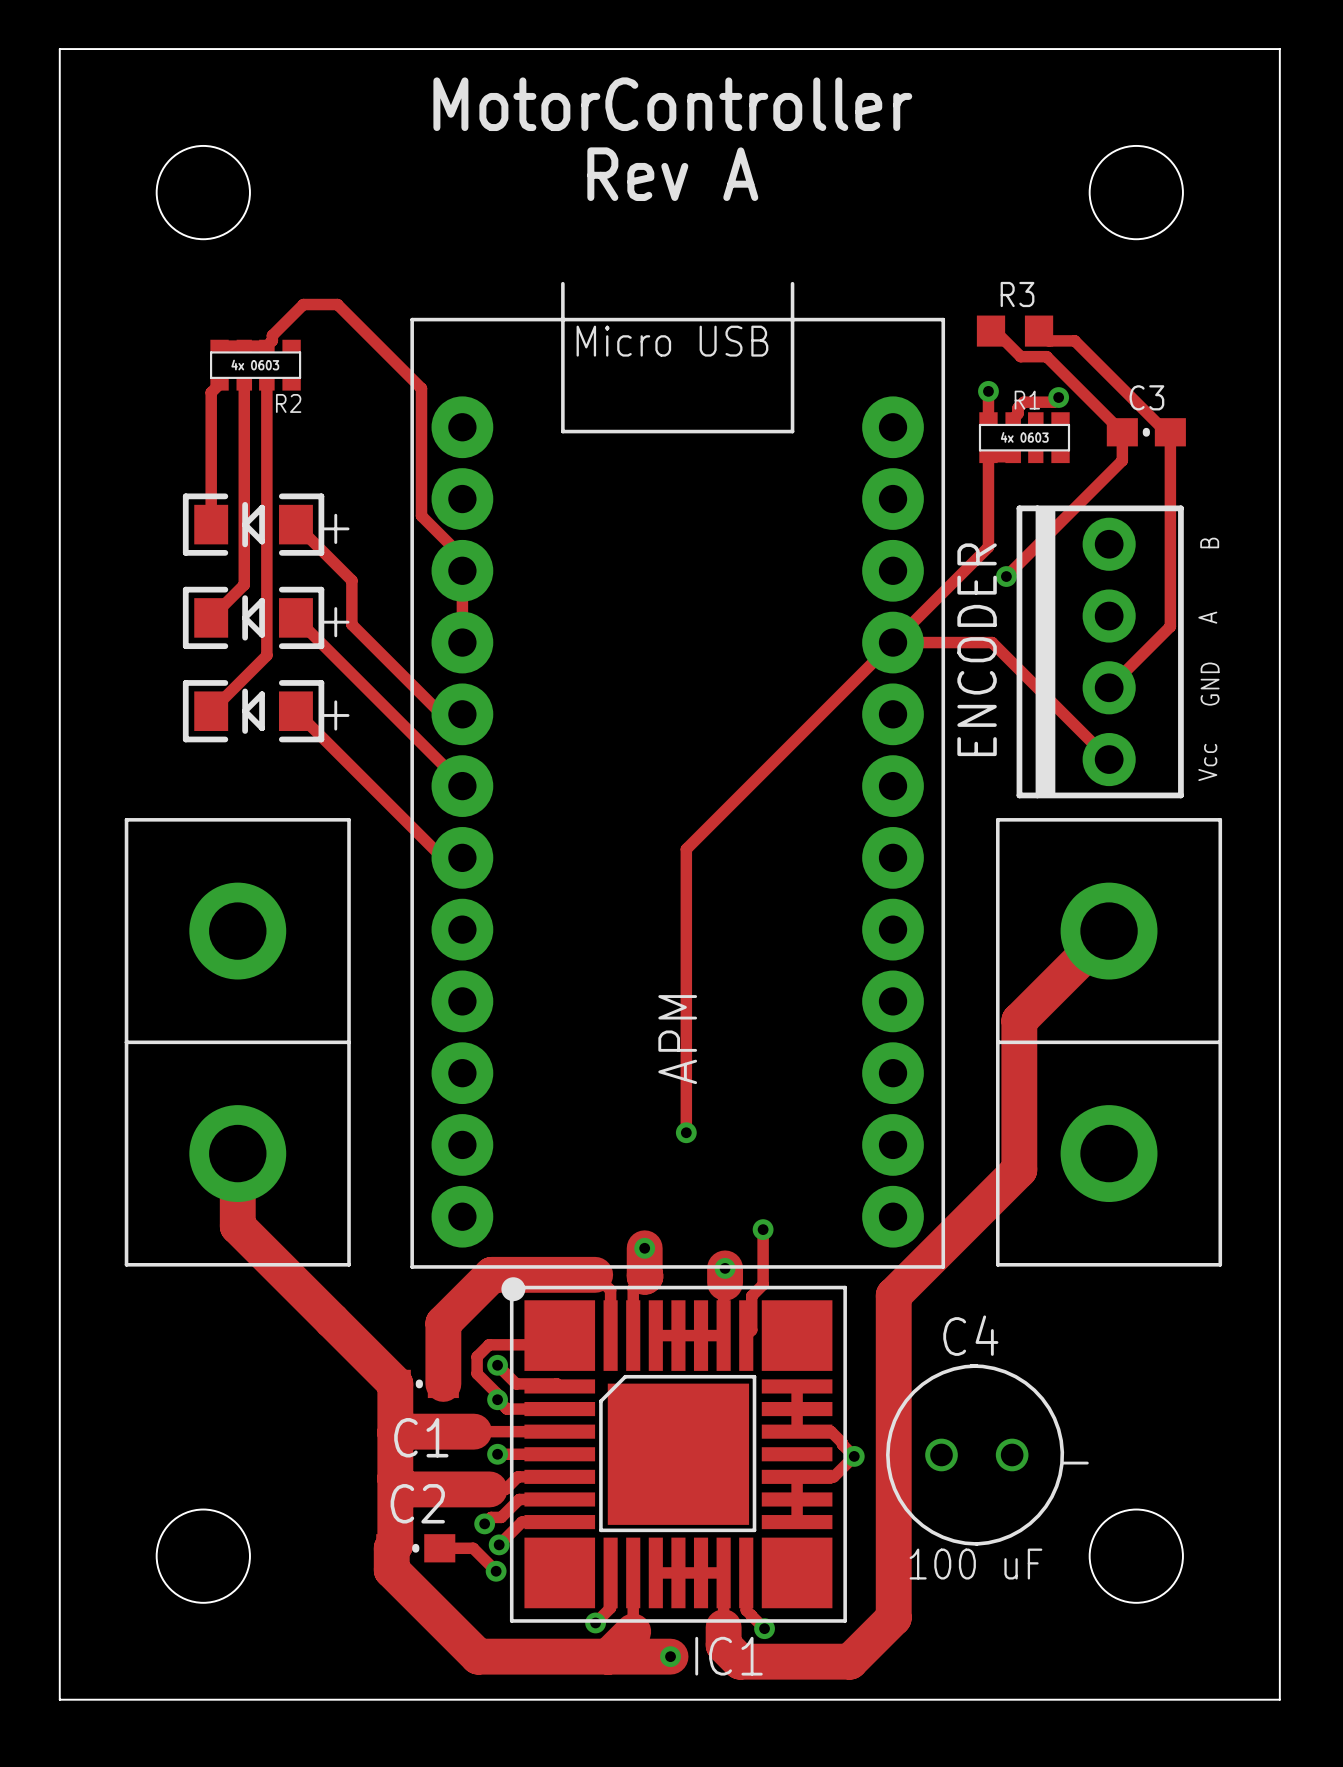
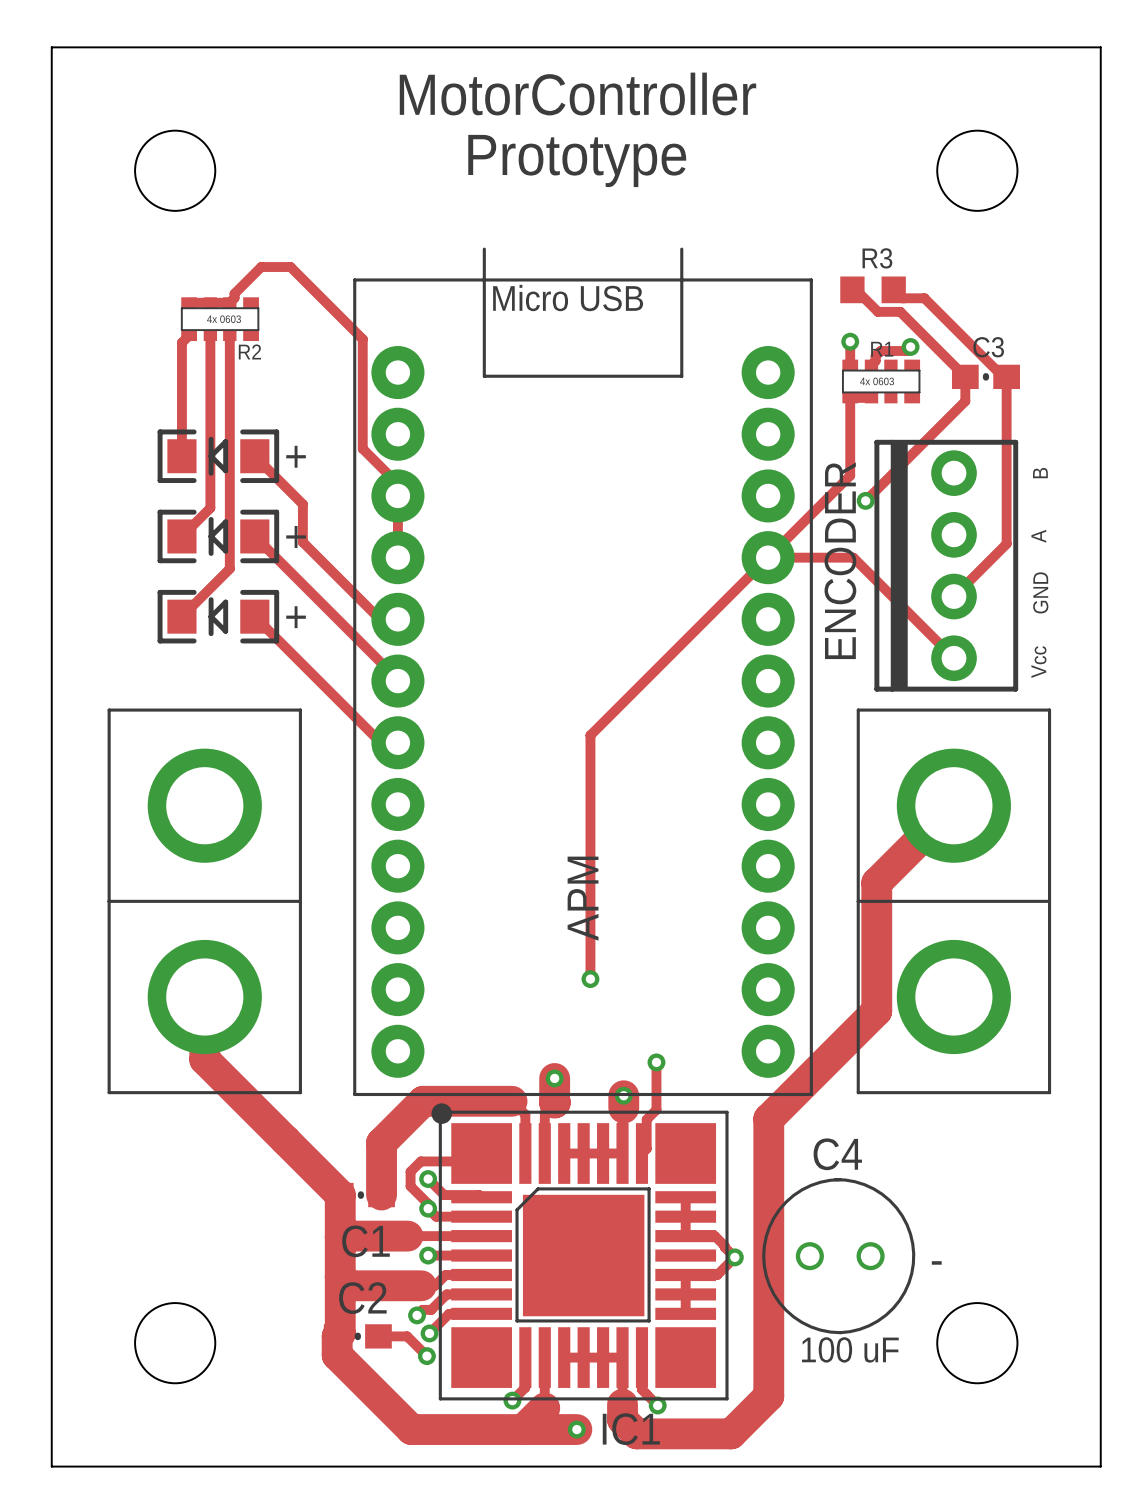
text: Rev A (672, 174) -> Prototype (577, 161)
part footprint: [124, 818, 351, 1267] -> [107, 708, 302, 1095]
part footprint: [996, 818, 1223, 1267] -> [856, 708, 1052, 1095]

